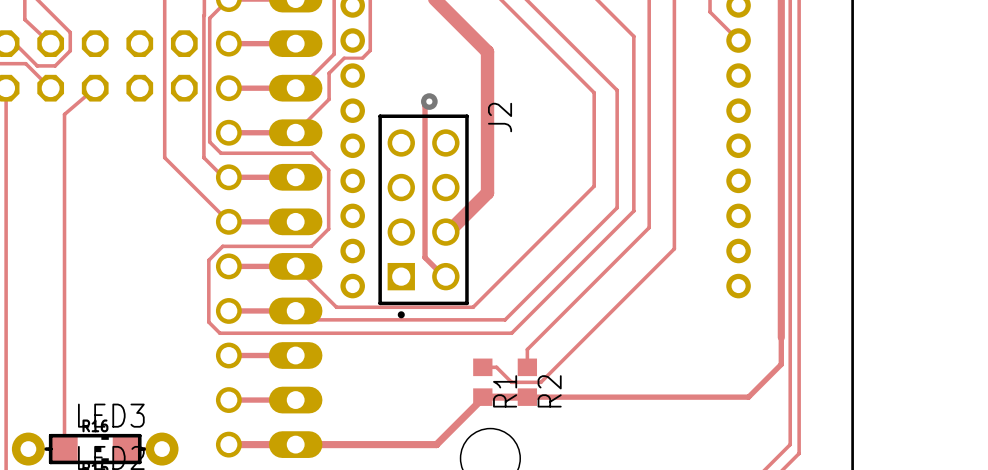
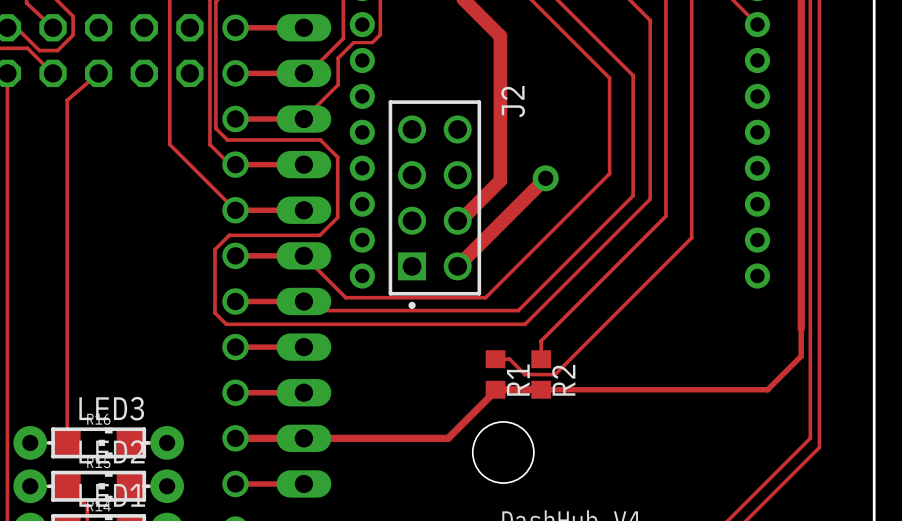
track: (429, 101) (425, 105) (425, 257) (445, 276) -> (545, 178) (457, 266)
via: (429, 101) -> none
via: none -> (545, 178)

